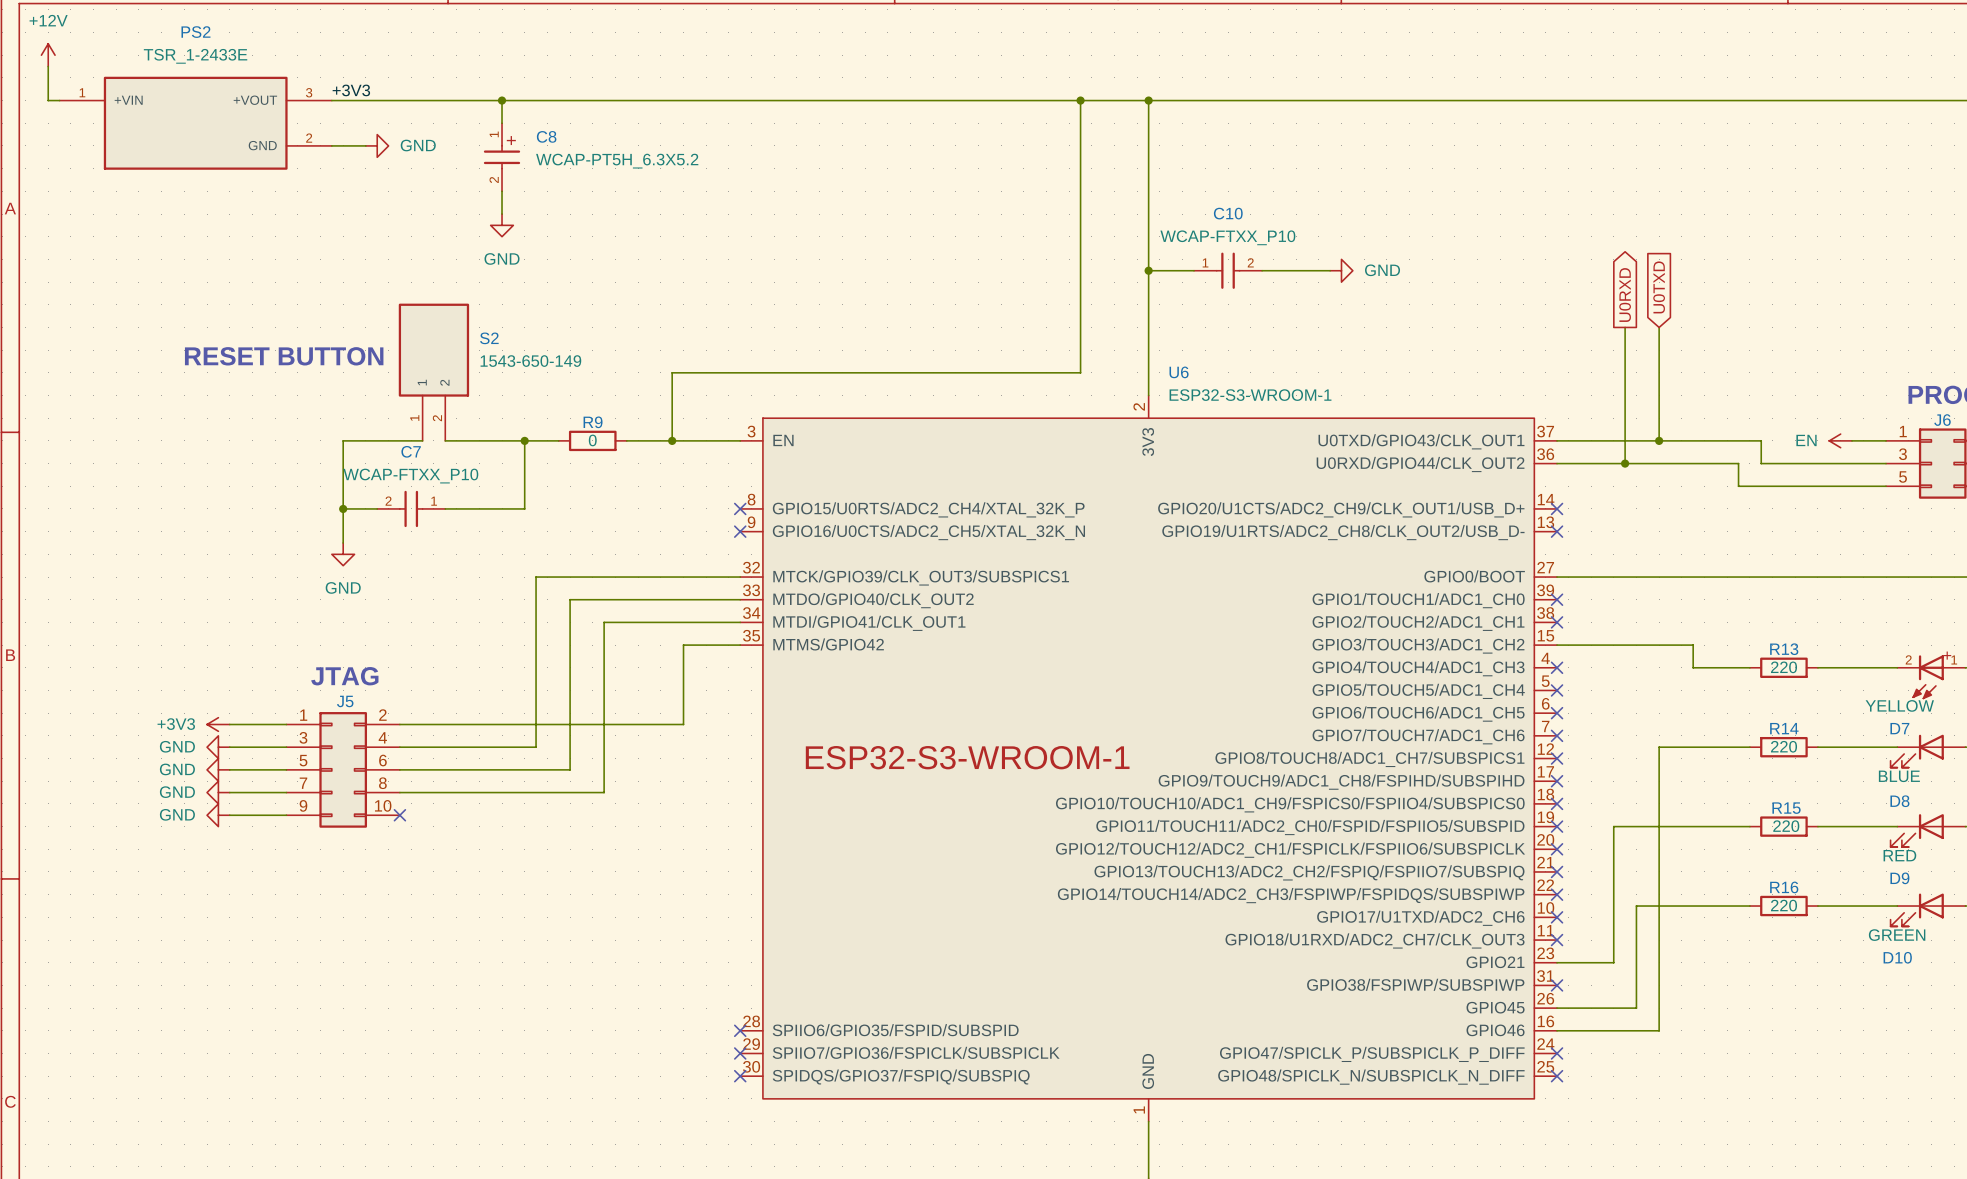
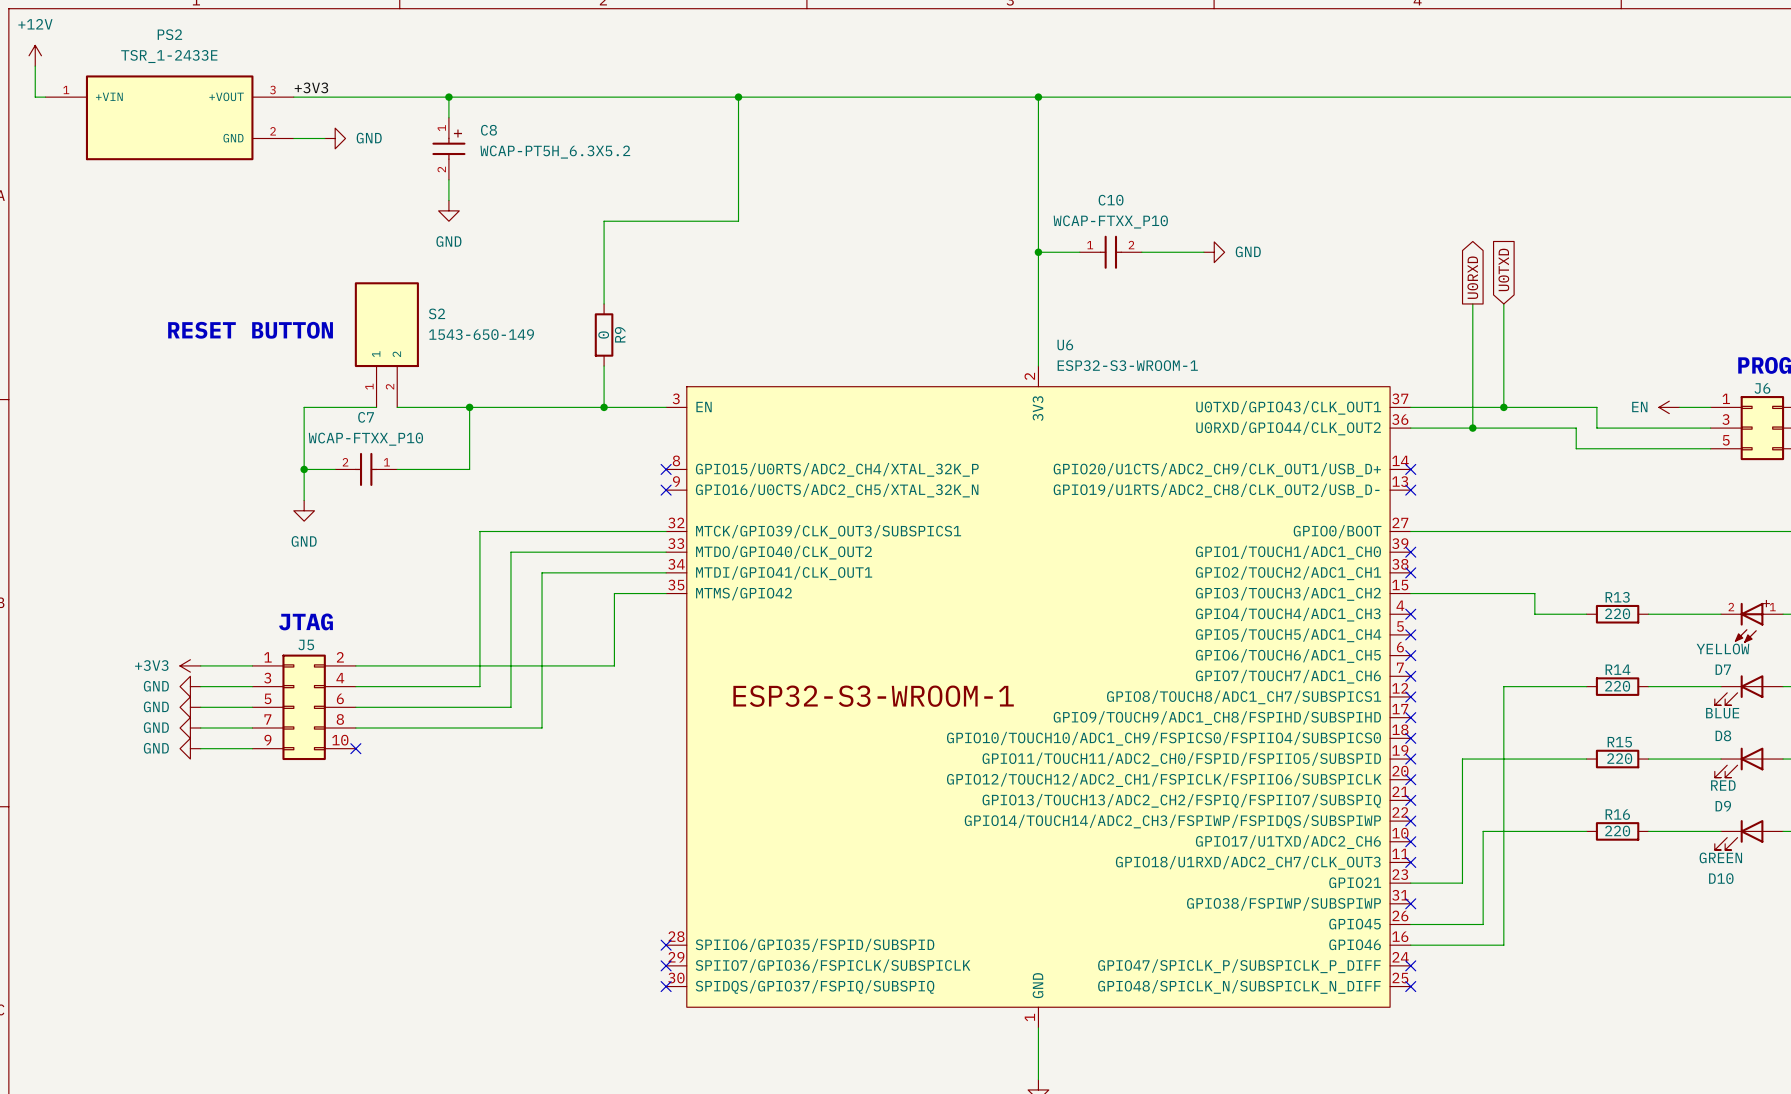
wire: none -> (738, 97) (738, 221) (604, 221) (604, 303)
junction: none -> (738, 97)
wire: (1080, 100) (1080, 372) (672, 372) (672, 395) -> none
junction: (1080, 100) -> none
wire: none -> (500, 407) (562, 407)
R9 rotation: 0° (592, 440) -> 90° clockwise (604, 334)
R9 position: (592, 440) -> (604, 334)

